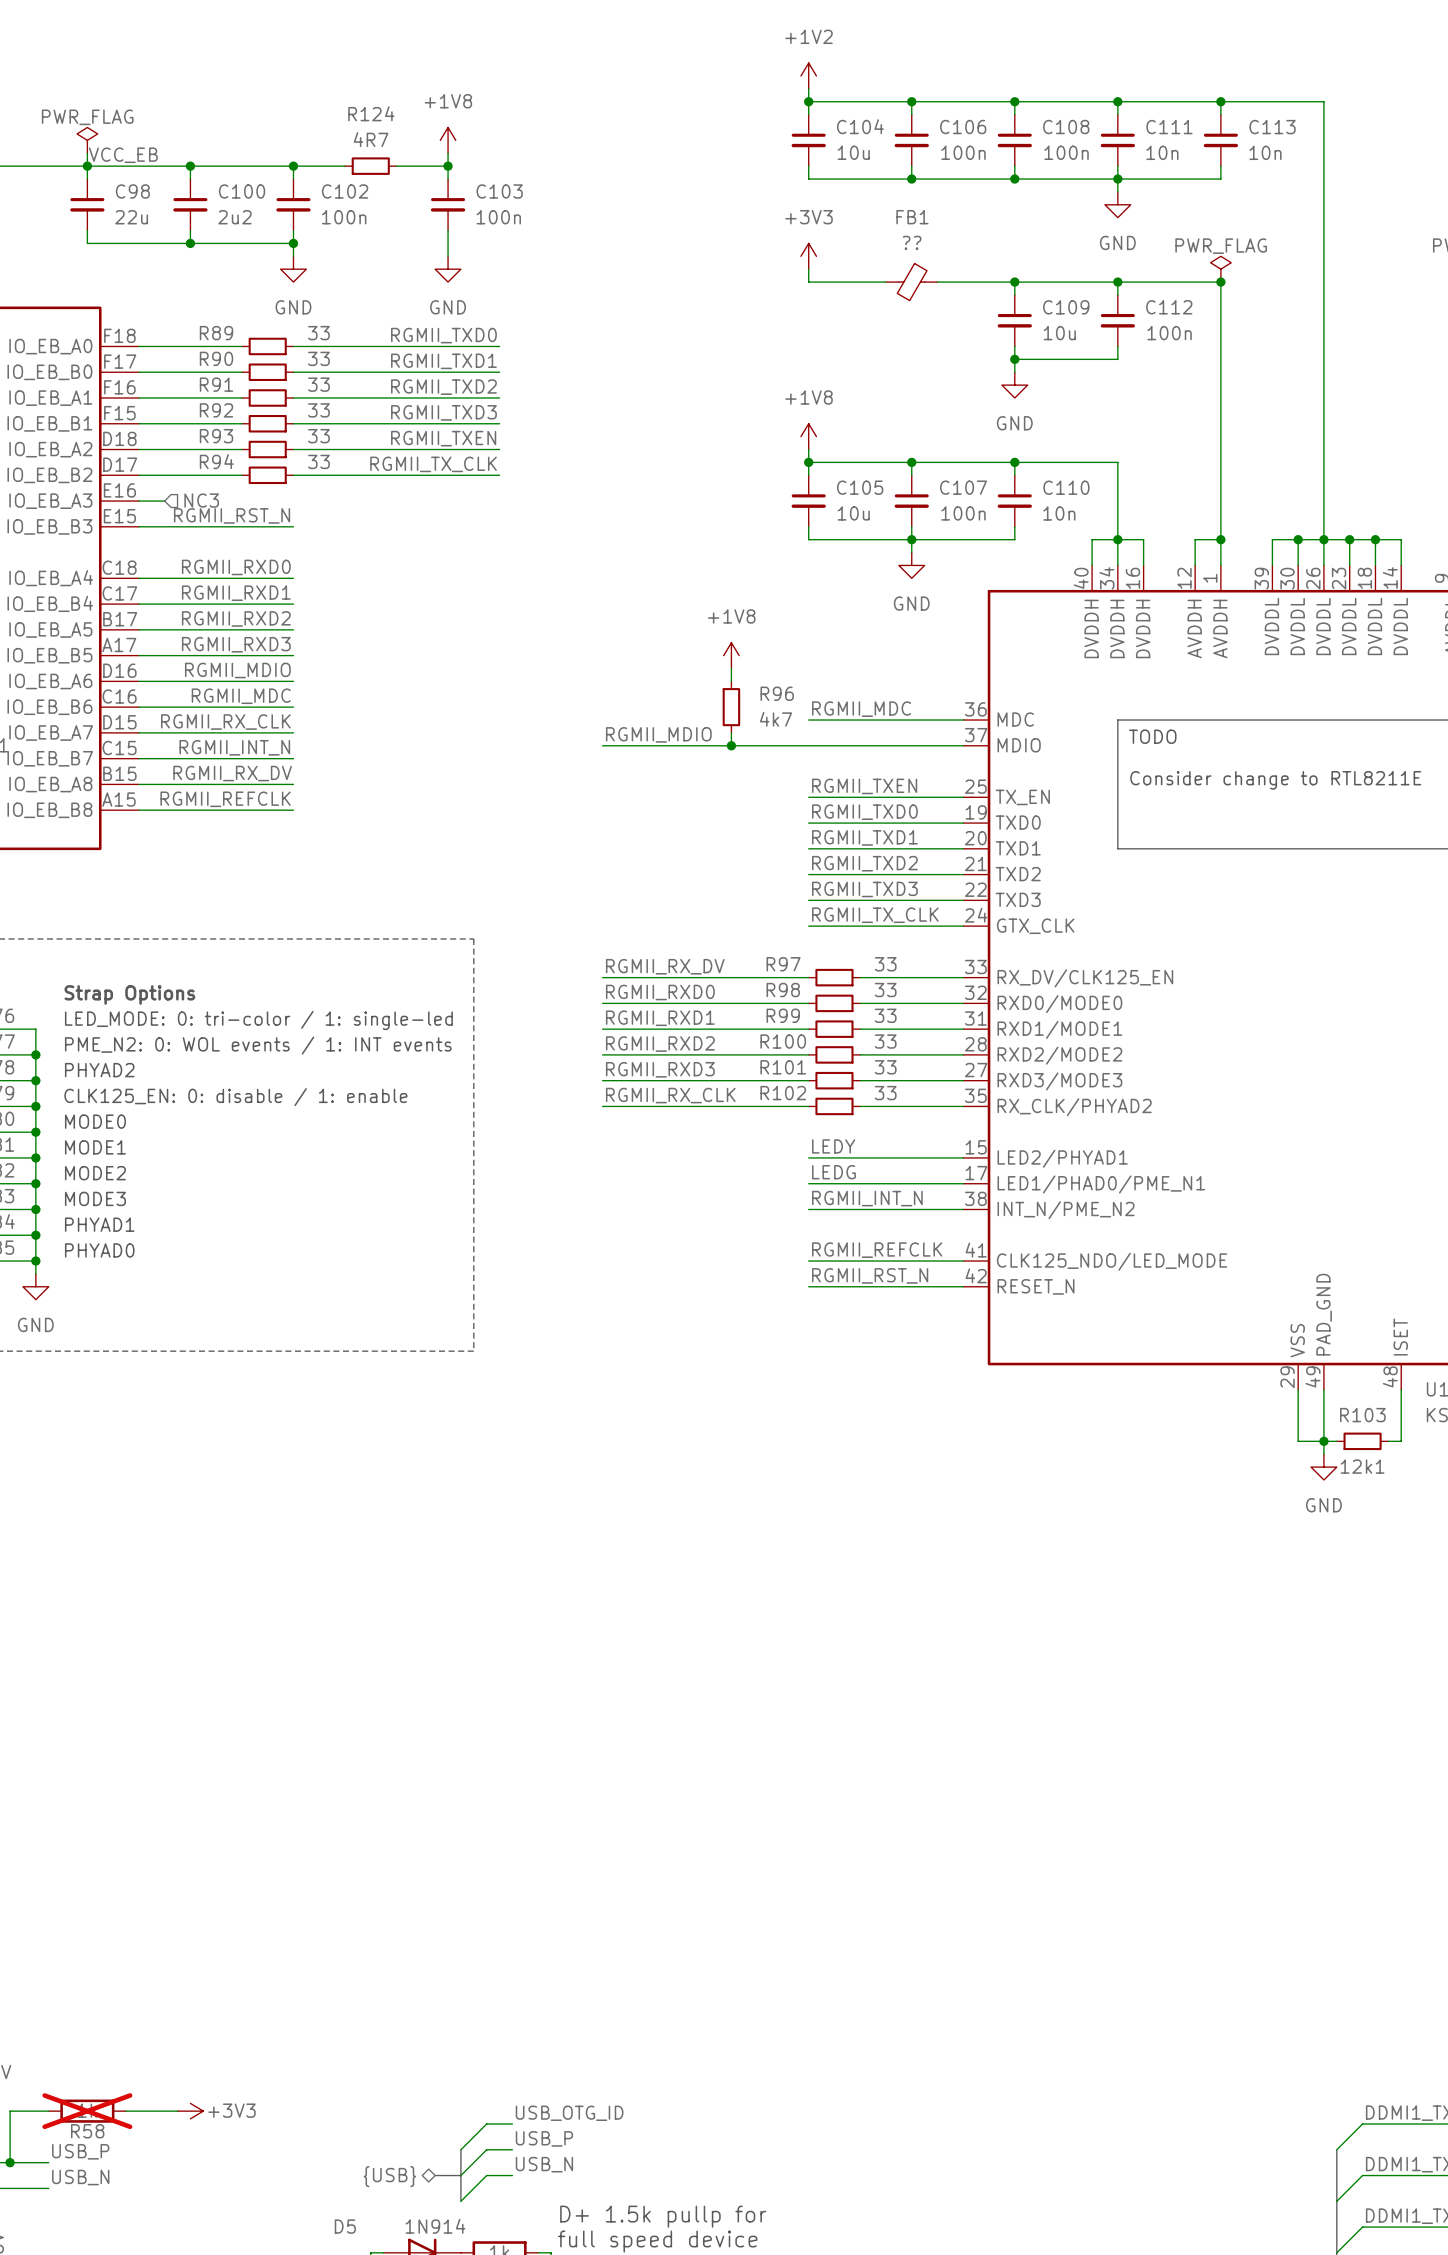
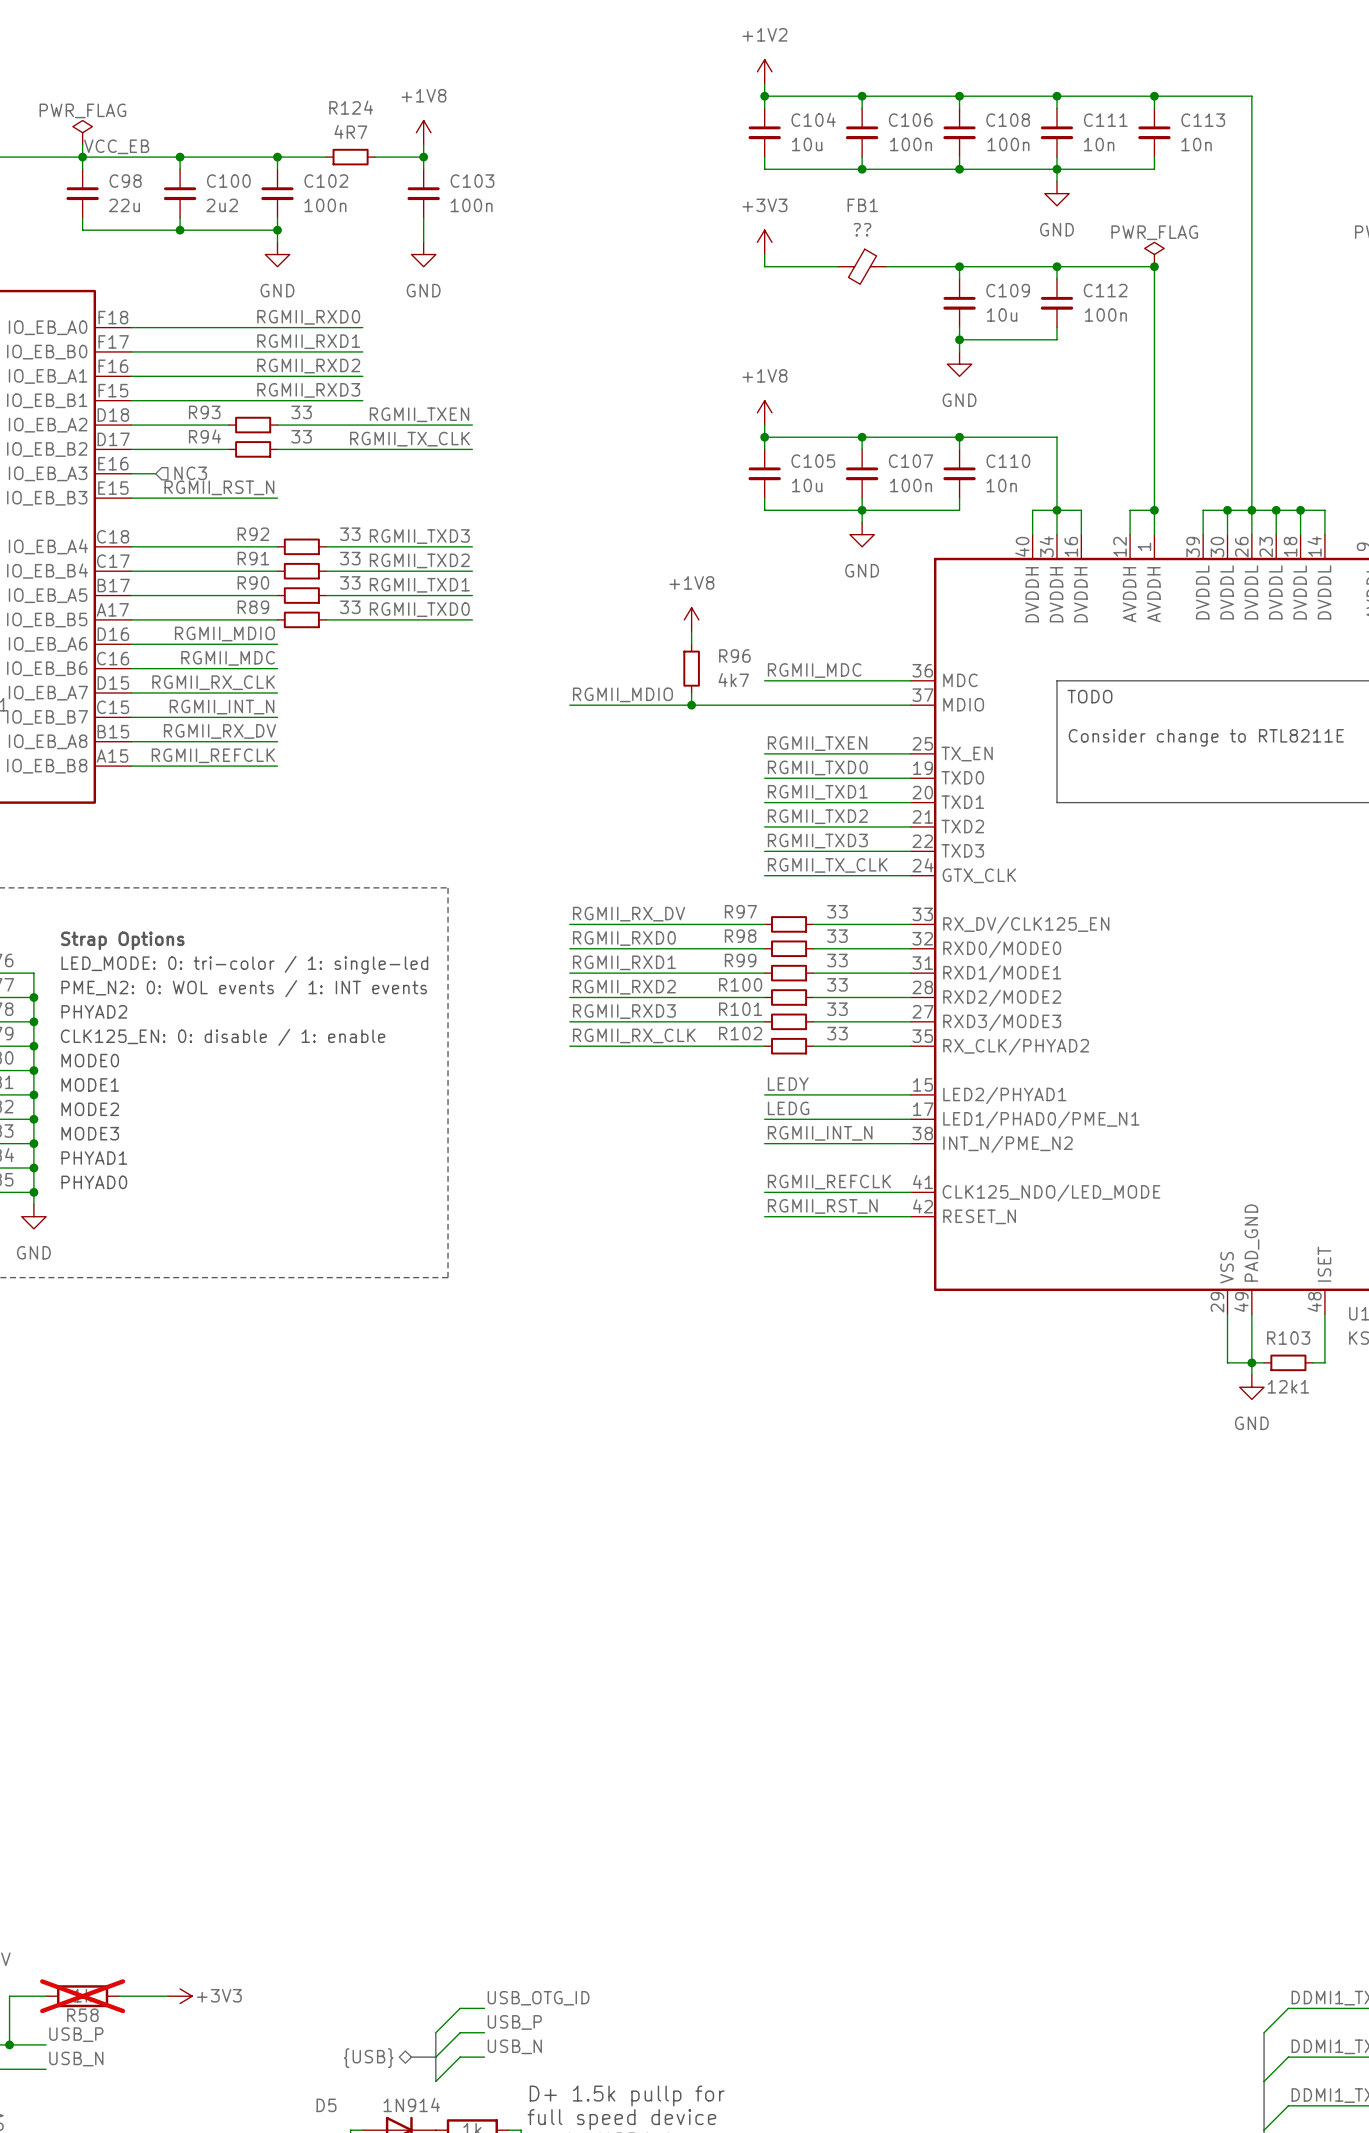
label: RGMII_TXD0 (443, 335) -> none
wire: none -> (228, 327) (277, 327)
R89 position: (267, 346) -> (301, 619)
wire: (383, 346) (499, 346) -> none
label: RGMII_TXD1 (443, 361) -> none
wire: none -> (228, 351) (277, 351)
R90 position: (267, 372) -> (301, 595)
wire: (383, 372) (499, 372) -> none
label position: RGMII_TXD2 (443, 387) -> RGMII_TXD2 (419, 560)
wire: none -> (228, 376) (277, 376)
R91 position: (267, 397) -> (301, 571)
wire: (383, 397) (499, 397) -> none
label position: RGMII_TXD3 (443, 412) -> RGMII_TXD3 (419, 536)
wire: none -> (228, 400) (277, 400)
R92 position: (267, 423) -> (301, 546)
wire: (383, 423) (499, 423) -> none
label position: RGMII_RXD0 (236, 567) -> RGMII_RXD0 (308, 317)
wire: none -> (326, 546) (472, 546)
label position: RGMII_RXD1 (236, 593) -> RGMII_RXD1 (308, 341)
wire: none -> (326, 571) (472, 571)
label position: RGMII_RXD2 (236, 618) -> RGMII_RXD2 (308, 366)
label: none -> RGMII_TXD1 (419, 585)
wire: none -> (326, 595) (472, 595)
label position: RGMII_RXD3 (236, 644) -> RGMII_RXD3 (308, 390)
label: none -> RGMII_TXD0 (419, 609)
wire: none -> (326, 619) (472, 619)

